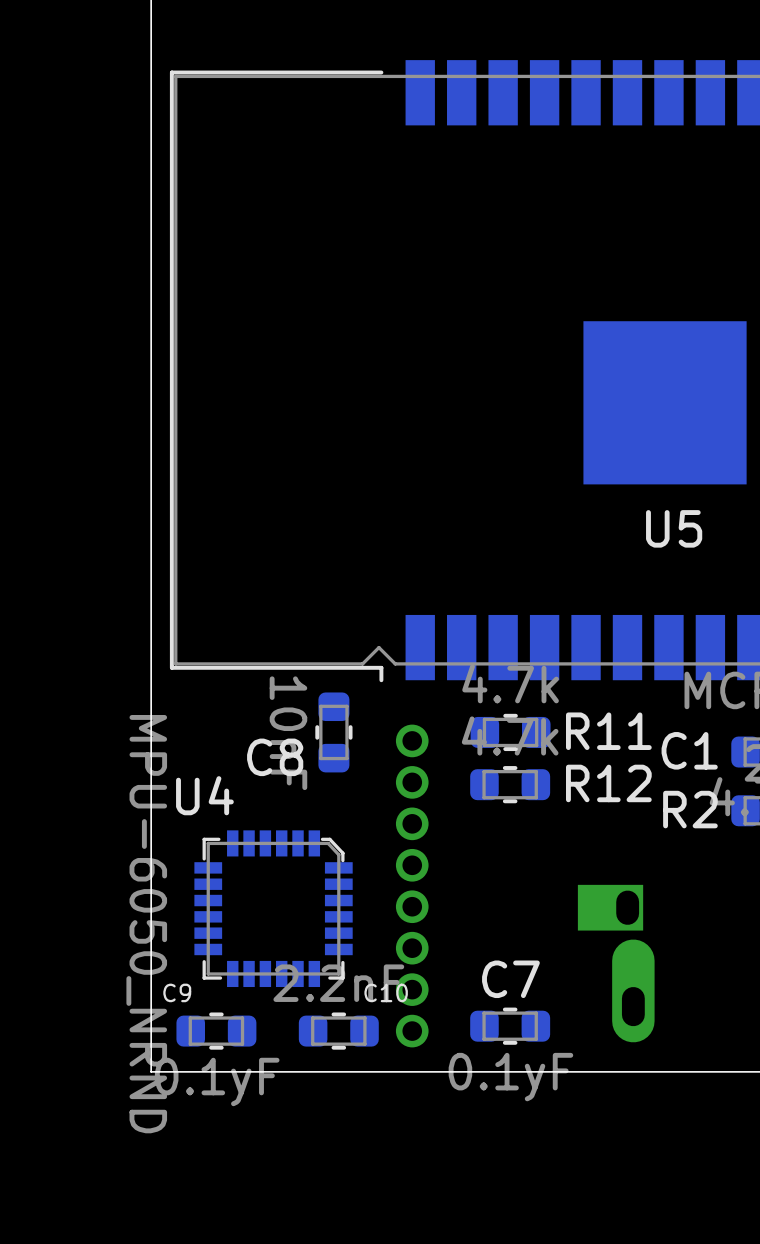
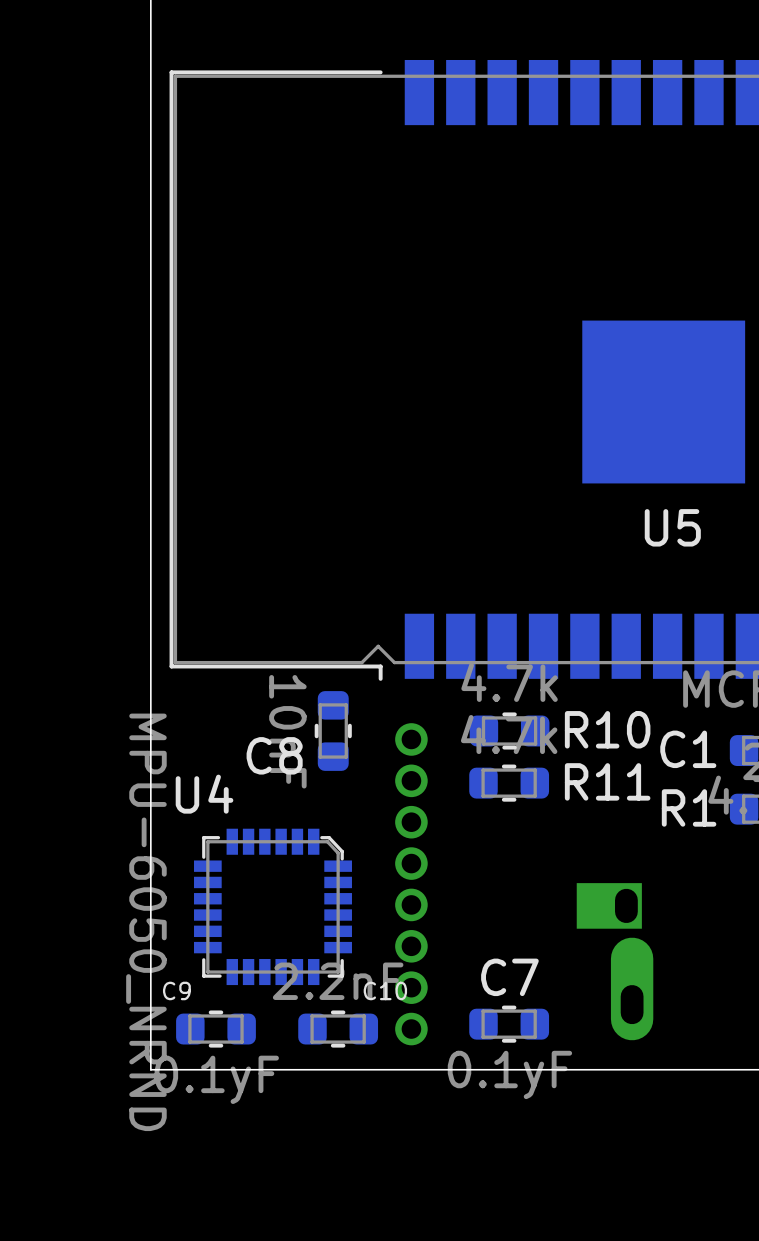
R11 name: R11 (608, 731) -> R10 (607, 729)
R12 name: R12 (608, 783) -> R11 (607, 781)
R2 name: R2 (690, 809) -> R1 (689, 807)

